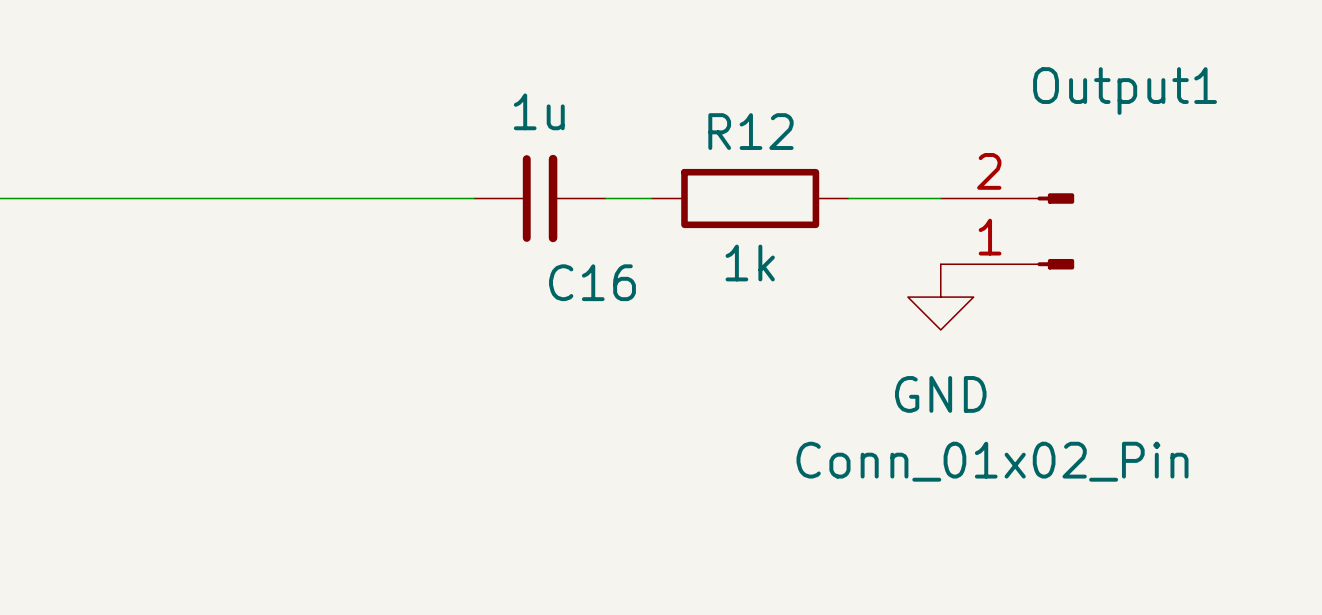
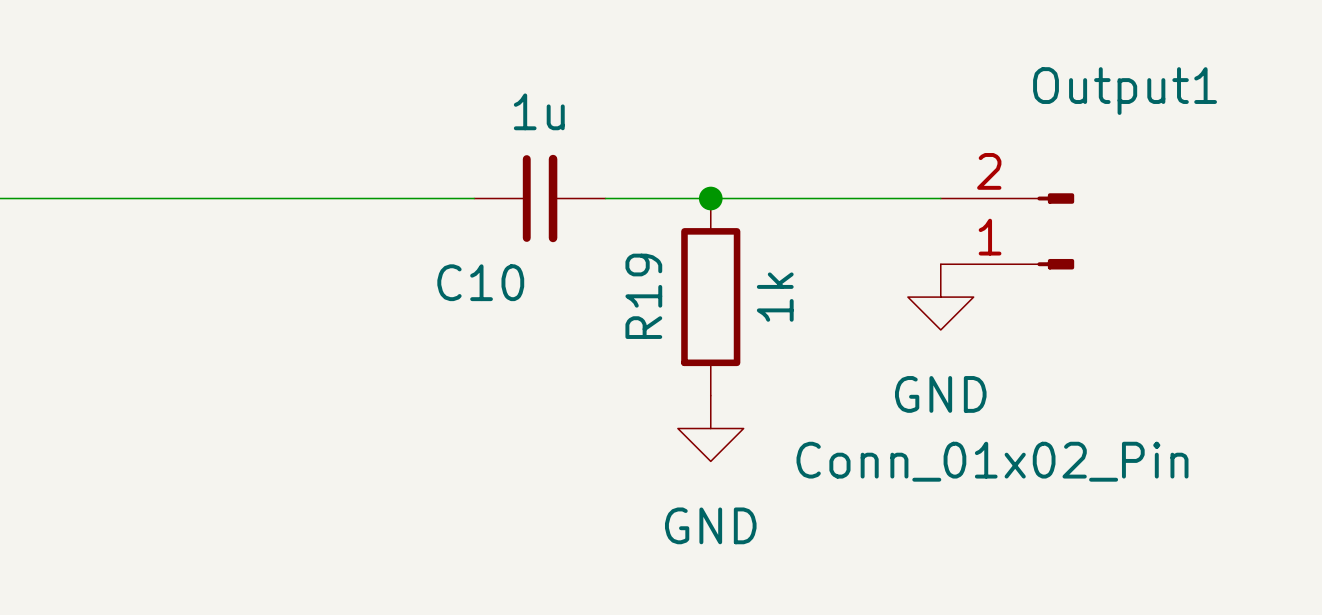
wire: none -> (651, 198) (848, 198)
junction: none -> (710, 198)
R12: 1k (750, 198) -> none
C16 name: C16 (592, 282) -> C10 (480, 282)
R19: none -> 1k (710, 297)
power symbol: none -> GND (710, 428)

